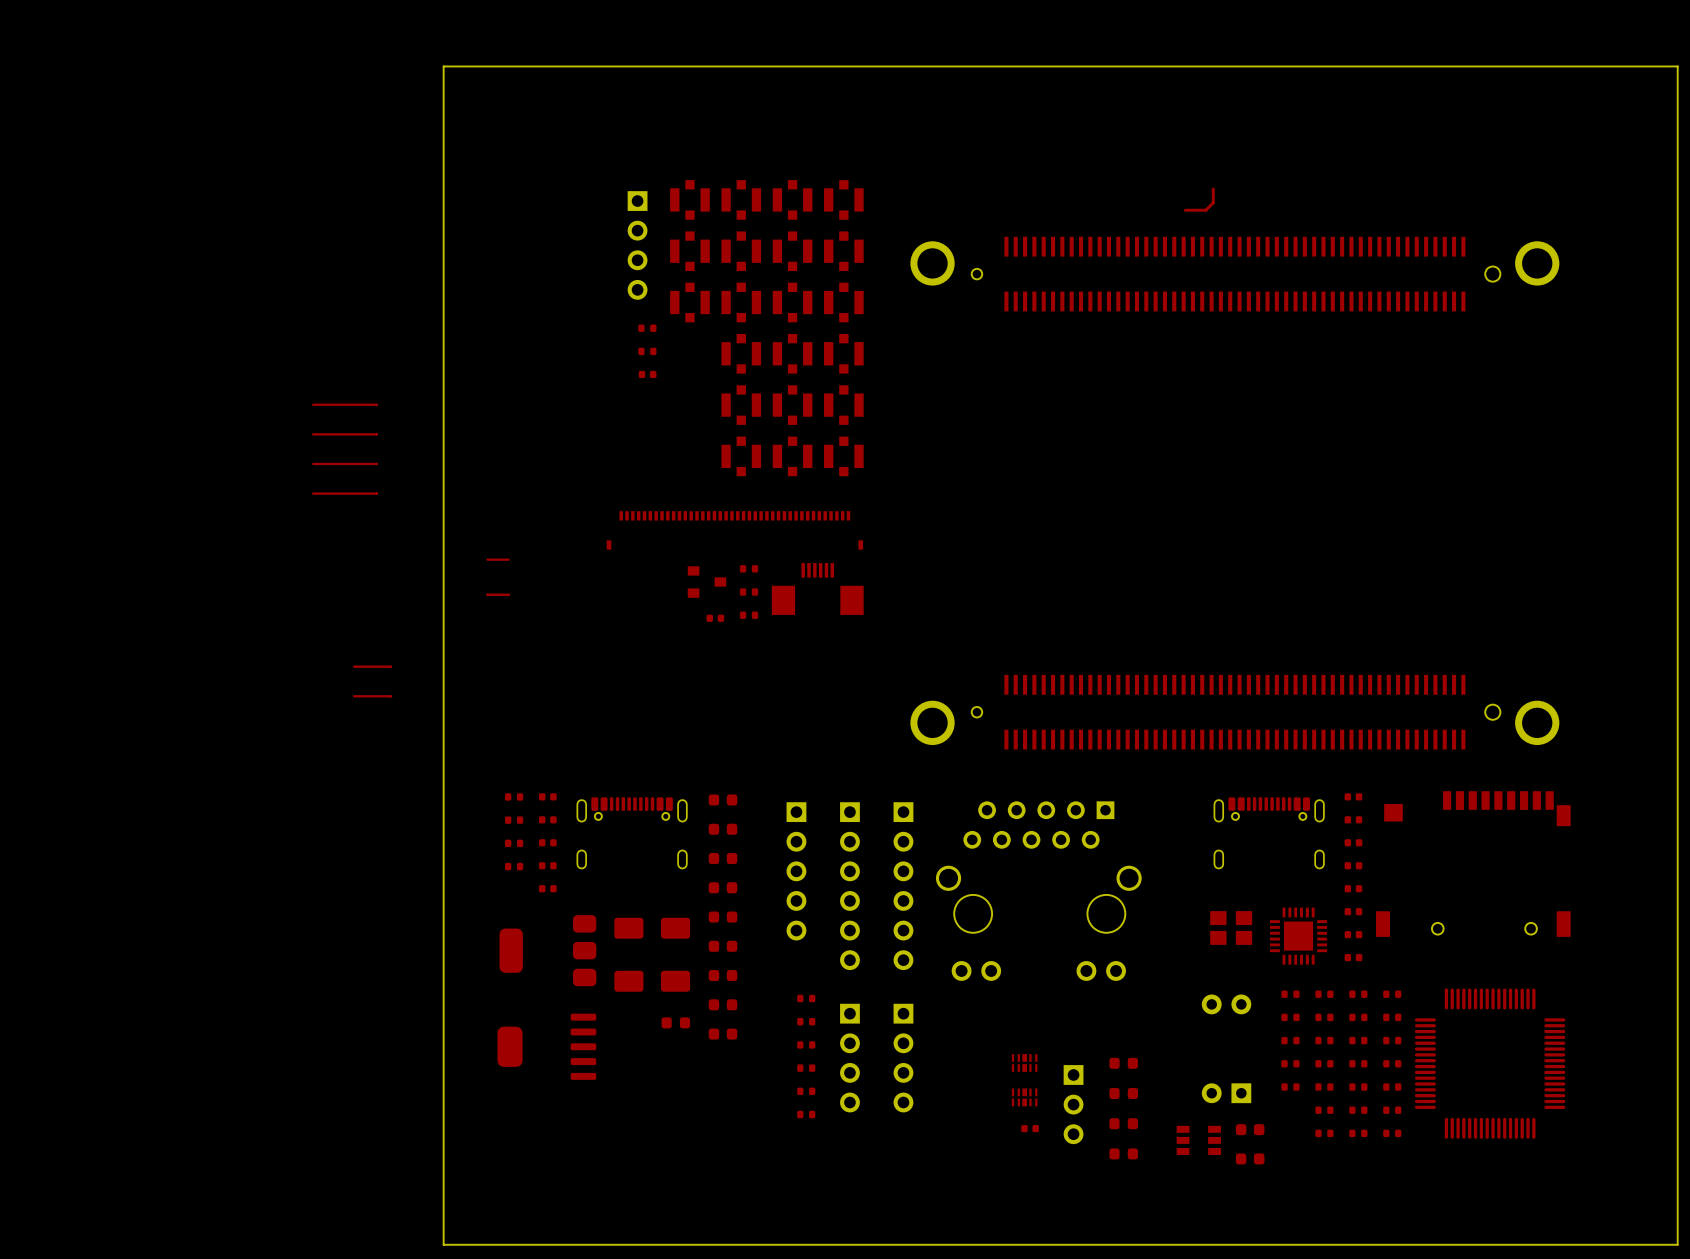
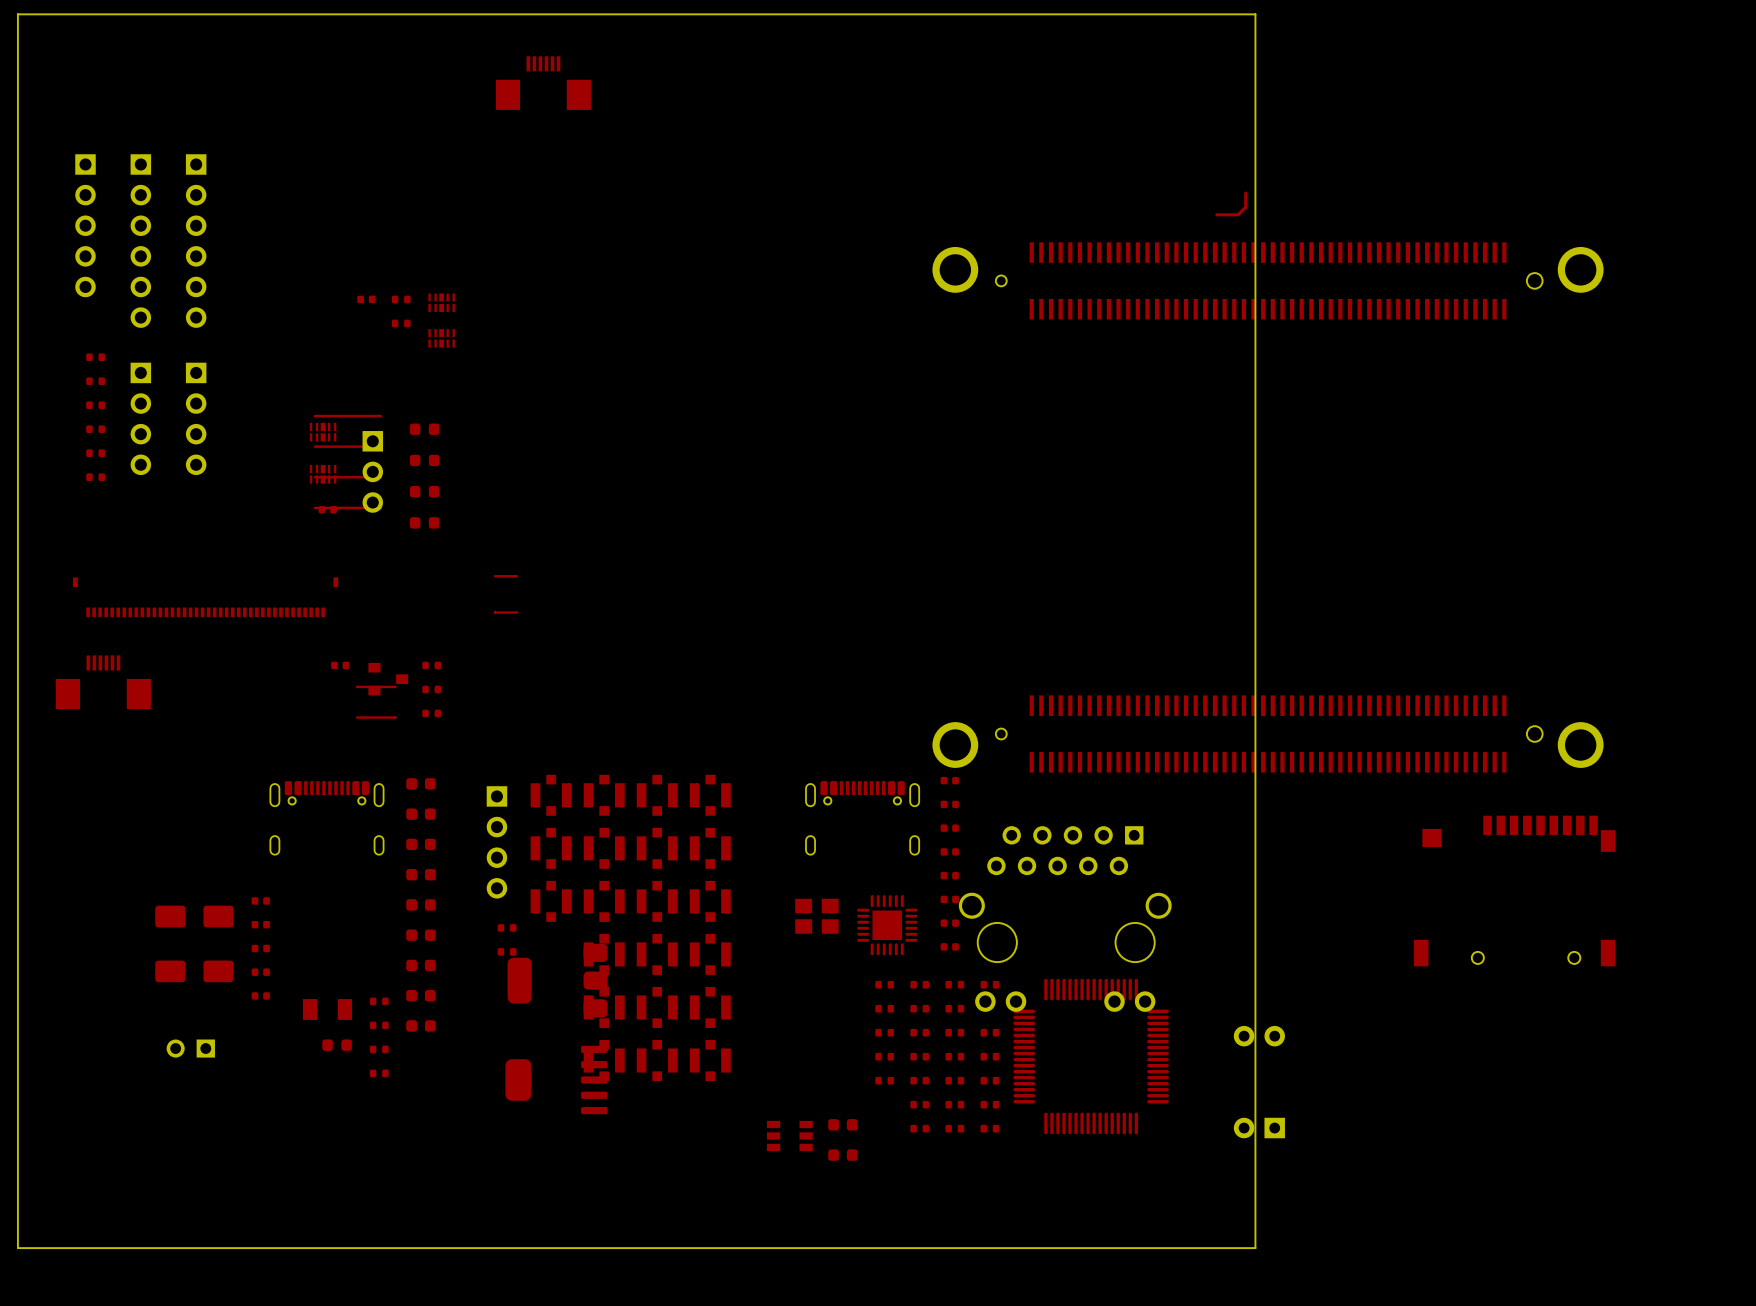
board edge: none -> (1255, 14) (17, 14) (17, 1248) (1255, 1248) (1255, 14)
board edge: (1677, 66) (443, 66) (443, 1244) (1677, 1244) (1677, 66) -> none
part: none -> (543, 83)
part: (689, 199) -> none
part: (741, 199) -> none
part: (792, 199) -> none
part: (843, 199) -> none
part: none -> (85, 225)
part: none -> (140, 241)
part: none -> (196, 241)
part: (637, 245) -> none
part: (689, 251) -> none
part: (741, 251) -> none
part: (792, 251) -> none
part: (843, 251) -> none
part: none -> (366, 299)
part: none -> (401, 299)
part: none -> (441, 302)
part: (689, 302) -> none
part: (741, 302) -> none
part: (792, 302) -> none
part: (843, 302) -> none
part: none -> (401, 323)
part: (647, 328) -> none
part: none -> (441, 338)
part: none -> (95, 357)
part: (647, 351) -> none
part: (741, 353) -> none
part: (792, 353) -> none
part: (843, 353) -> none
part: none -> (95, 381)
part: (647, 374) -> none
part: none -> (95, 405)
part: (741, 405) -> none
part: (792, 405) -> none
part: (843, 405) -> none
part: none -> (140, 418)
part: none -> (196, 418)
part: none -> (95, 429)
part: none -> (424, 429)
part: none -> (323, 432)
part: none -> (95, 453)
part: none -> (424, 460)
part: (741, 456) -> none
part: (792, 456) -> none
part: (843, 456) -> none
part: none -> (372, 471)
part: none -> (323, 474)
part: none -> (95, 477)
part: none -> (424, 491)
part: none -> (327, 509)
part: none -> (424, 522)
part: (734, 530) -> none
part: (749, 568) -> none
part: none -> (205, 597)
part: (706, 582) -> none
part: (817, 589) -> none
part: (749, 592) -> none
part: (749, 615) -> none
part: (715, 618) -> none
part: none -> (340, 665)
part: none -> (431, 665)
part: none -> (388, 679)
part: none -> (103, 682)
part: none -> (431, 689)
part: none -> (431, 713)
part: none -> (949, 780)
part: none -> (421, 783)
part: none -> (551, 795)
part: none -> (604, 795)
part: none -> (657, 795)
part: none -> (710, 795)
part: none -> (949, 804)
part: none -> (421, 814)
part: none -> (326, 818)
part: none -> (862, 818)
part: (514, 796) -> none
part: (547, 796) -> none
part: (1353, 796) -> none
part: (723, 799) -> none
part: none -> (949, 828)
part footprint: [538, 816, 557, 824] -> [530, 827, 572, 869]
part: none -> (496, 842)
part: none -> (421, 844)
part: (1353, 819) -> none
part: (514, 820) -> none
part: none -> (604, 848)
part: none -> (657, 848)
part: none -> (710, 848)
part: none -> (949, 851)
part: (723, 829) -> none
part: (632, 833) -> none
part: (1269, 833) -> none
part: (547, 842) -> none
part: (1353, 842) -> none
part: (514, 843) -> none
part: none -> (421, 874)
part: none -> (949, 875)
part: (723, 858) -> none
part: (547, 865) -> none
part: (1353, 865) -> none
part: (514, 866) -> none
part: (796, 871) -> none
part: none -> (949, 899)
part: none -> (260, 900)
part: none -> (551, 901)
part: none -> (604, 901)
part: none -> (657, 901)
part: none -> (710, 901)
part: none -> (421, 904)
part: (849, 886) -> none
part: (903, 886) -> none
part: (723, 887) -> none
part: none -> (194, 916)
part: (547, 888) -> none
part: none -> (816, 916)
part: (1353, 888) -> none
part: none -> (949, 923)
part: none -> (260, 924)
part: none -> (887, 925)
part: none -> (507, 927)
part: none -> (421, 935)
part: (1353, 911) -> none
part footprint: [614, 917, 691, 939] -> [636, 933, 678, 975]
part: (723, 917) -> none
part: none -> (949, 946)
part: none -> (260, 948)
part: none -> (507, 951)
part: none -> (604, 954)
part: none -> (710, 954)
part: (1231, 927) -> none
part: (1353, 934) -> none
part: none -> (421, 965)
part: (1298, 936) -> none
part: none -> (194, 971)
part: none -> (260, 972)
part: (723, 946) -> none
part: none -> (884, 984)
part: none -> (919, 984)
part: none -> (954, 984)
part: none -> (989, 984)
part: (1353, 957) -> none
part: none -> (260, 995)
part: none -> (421, 995)
part: none -> (379, 1001)
part footprint: [614, 970, 691, 992] -> [636, 986, 678, 1028]
part: (723, 975) -> none
part: none -> (604, 1007)
part: none -> (710, 1007)
part: none -> (884, 1008)
part: none -> (919, 1008)
part: none -> (954, 1008)
part: none -> (327, 1009)
part: none -> (379, 1025)
part: none -> (421, 1025)
part: (1290, 994) -> none
part: (1324, 994) -> none
part: (1358, 994) -> none
part: (1392, 994) -> none
part: (806, 998) -> none
part: none -> (884, 1032)
part: none -> (919, 1032)
part: none -> (954, 1032)
part: none -> (989, 1032)
part: (723, 1004) -> none
part: none -> (337, 1045)
part: none -> (190, 1048)
part: none -> (379, 1049)
part: (1290, 1017) -> none
part: (1324, 1017) -> none
part: (1358, 1017) -> none
part: (1392, 1017) -> none
part: (806, 1021) -> none
part: (675, 1022) -> none
part: none -> (884, 1056)
part: none -> (919, 1056)
part: none -> (954, 1056)
part: none -> (989, 1056)
part: none -> (1091, 1056)
part: none -> (604, 1060)
part: none -> (657, 1060)
part: none -> (710, 1060)
part: (723, 1034) -> none
part: none -> (379, 1073)
part: (1290, 1040) -> none
part: (1324, 1040) -> none
part: (1358, 1040) -> none
part: (1392, 1040) -> none
part: (806, 1044) -> none
part: none -> (884, 1080)
part: none -> (919, 1080)
part: none -> (954, 1080)
part: none -> (989, 1080)
part: (849, 1058) -> none
part: (903, 1058) -> none
part: (1024, 1062) -> none
part: (1123, 1063) -> none
part: (1290, 1063) -> none
part: (1324, 1063) -> none
part: (1358, 1063) -> none
part: (1392, 1063) -> none
part: (1490, 1063) -> none
part: (806, 1068) -> none
part: none -> (919, 1104)
part: none -> (954, 1104)
part: none -> (989, 1104)
part: (1290, 1087) -> none
part: (1324, 1087) -> none
part: (1358, 1087) -> none
part: (1392, 1087) -> none
part: none -> (842, 1124)
part: (806, 1091) -> none
part: none -> (919, 1128)
part: none -> (954, 1128)
part: none -> (989, 1128)
part: (1123, 1093) -> none
part: (1024, 1097) -> none
part: none -> (789, 1135)
part: (1073, 1104) -> none
part: (1324, 1110) -> none
part: (1358, 1110) -> none
part: (1392, 1110) -> none
part: (806, 1114) -> none
part: none -> (842, 1155)
part: (1123, 1123) -> none
part: (1030, 1128) -> none
part: (1250, 1129) -> none
part: (1324, 1133) -> none
part: (1358, 1133) -> none
part: (1392, 1133) -> none
part: (1198, 1140) -> none
part: (1123, 1153) -> none
part: (1250, 1158) -> none

